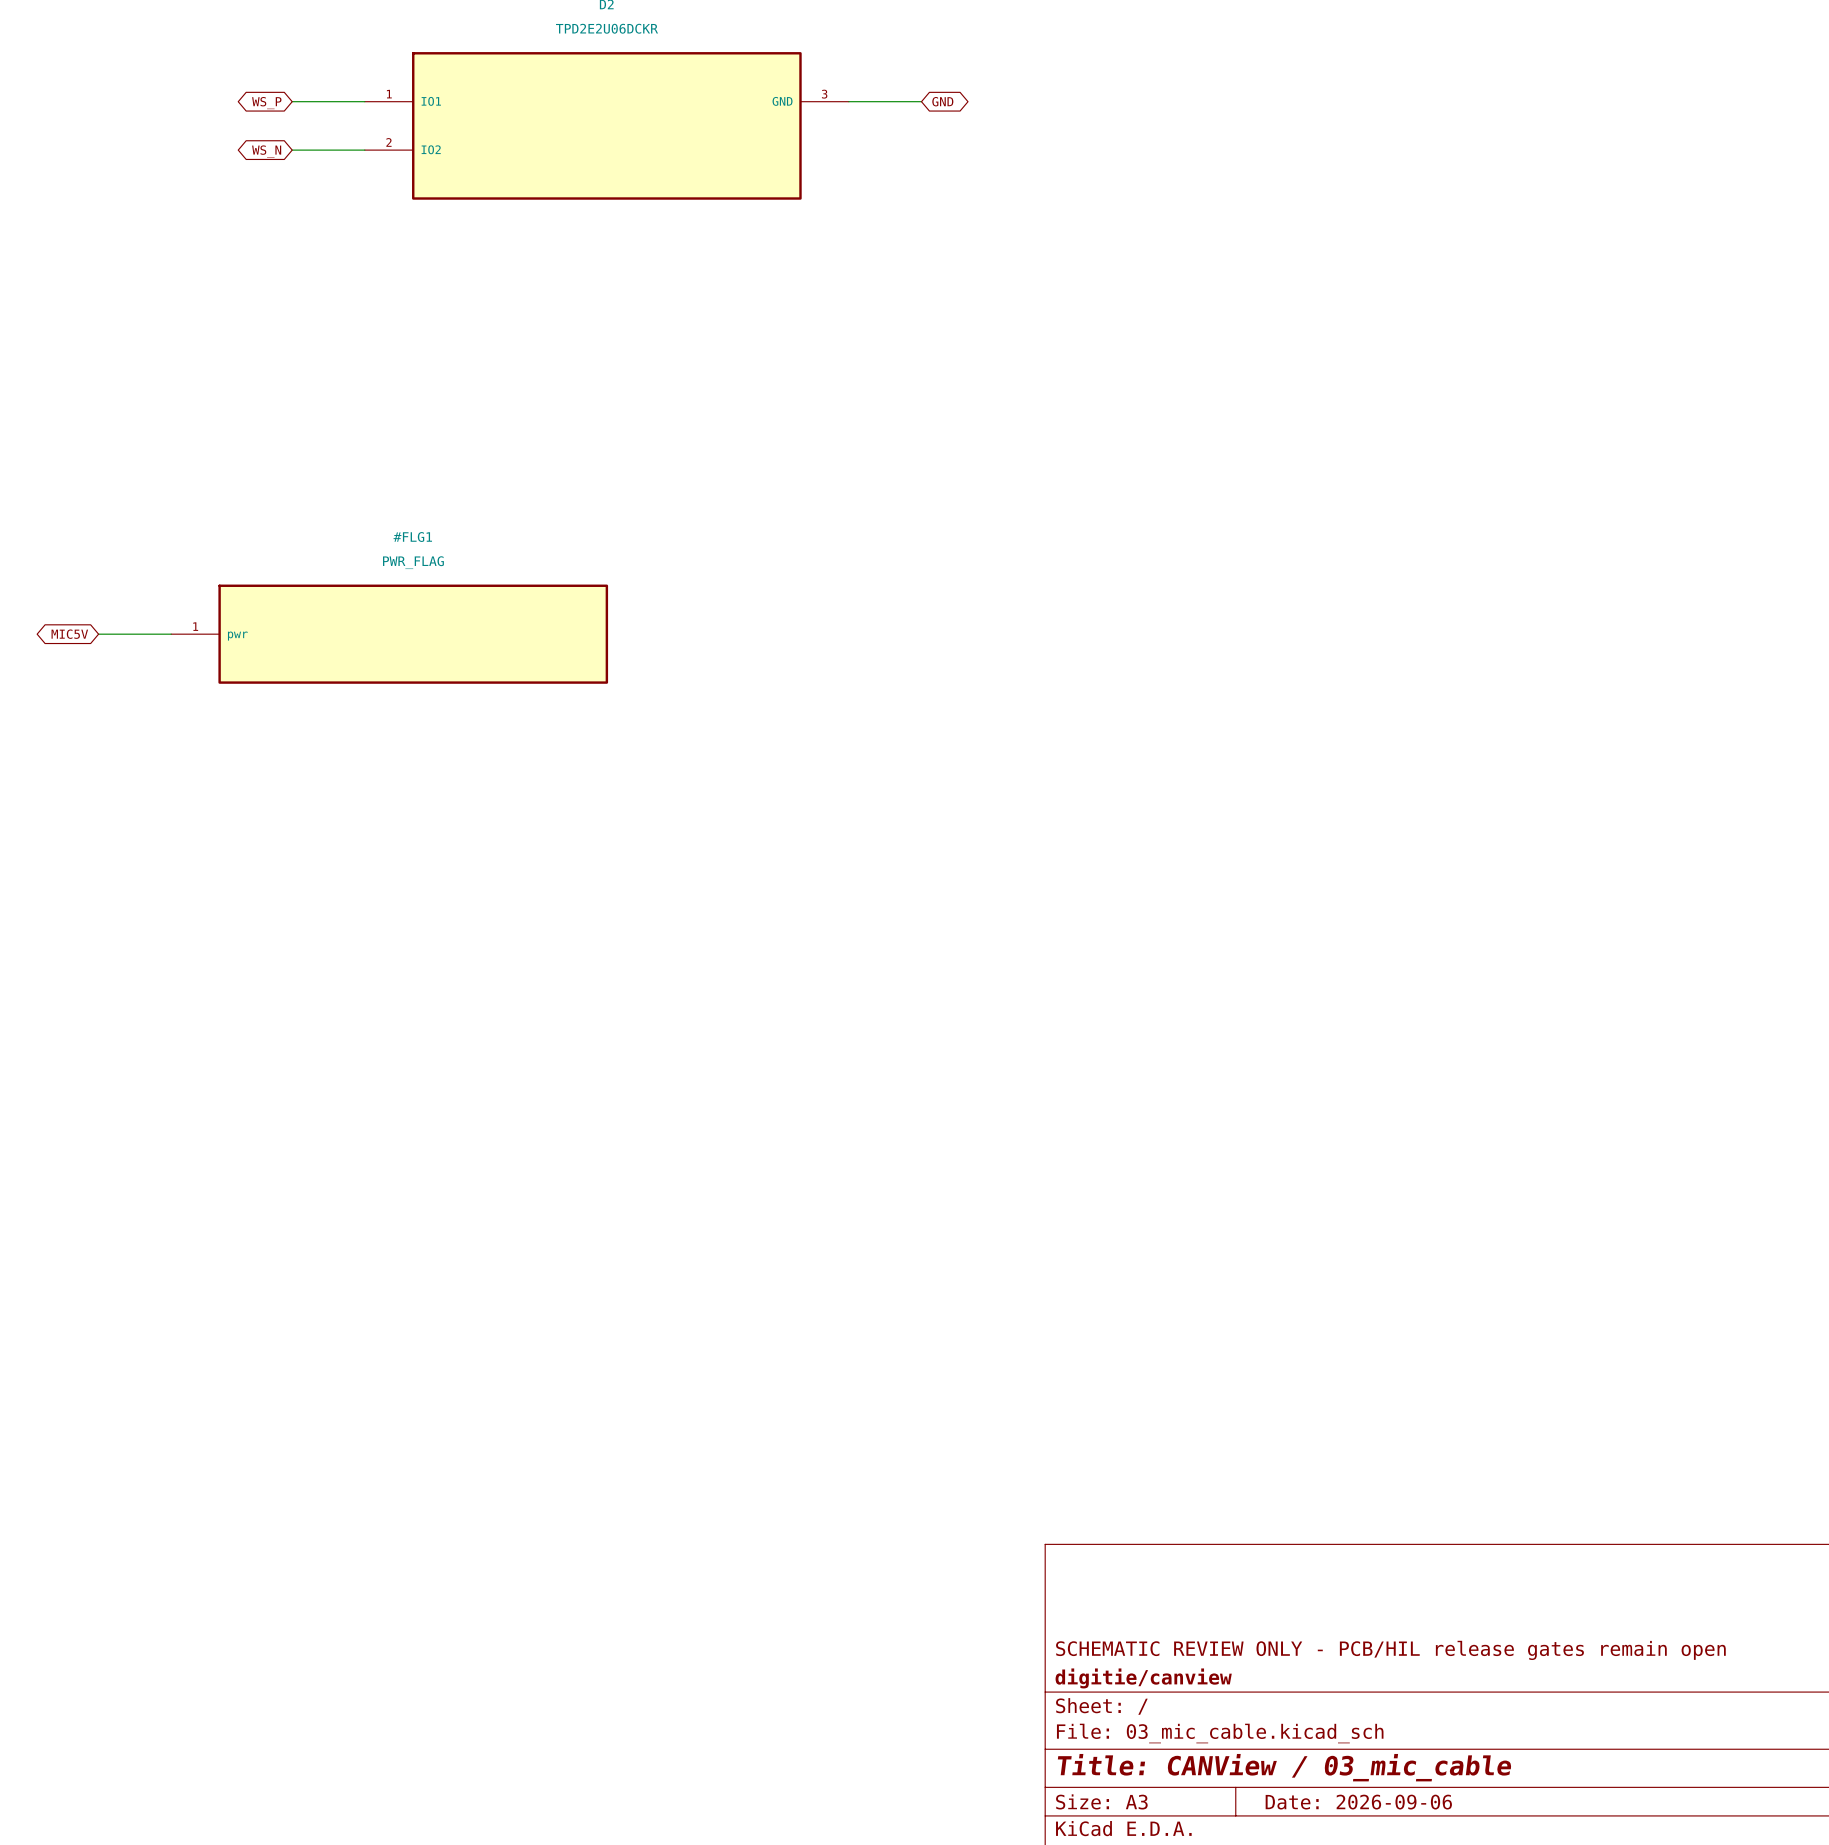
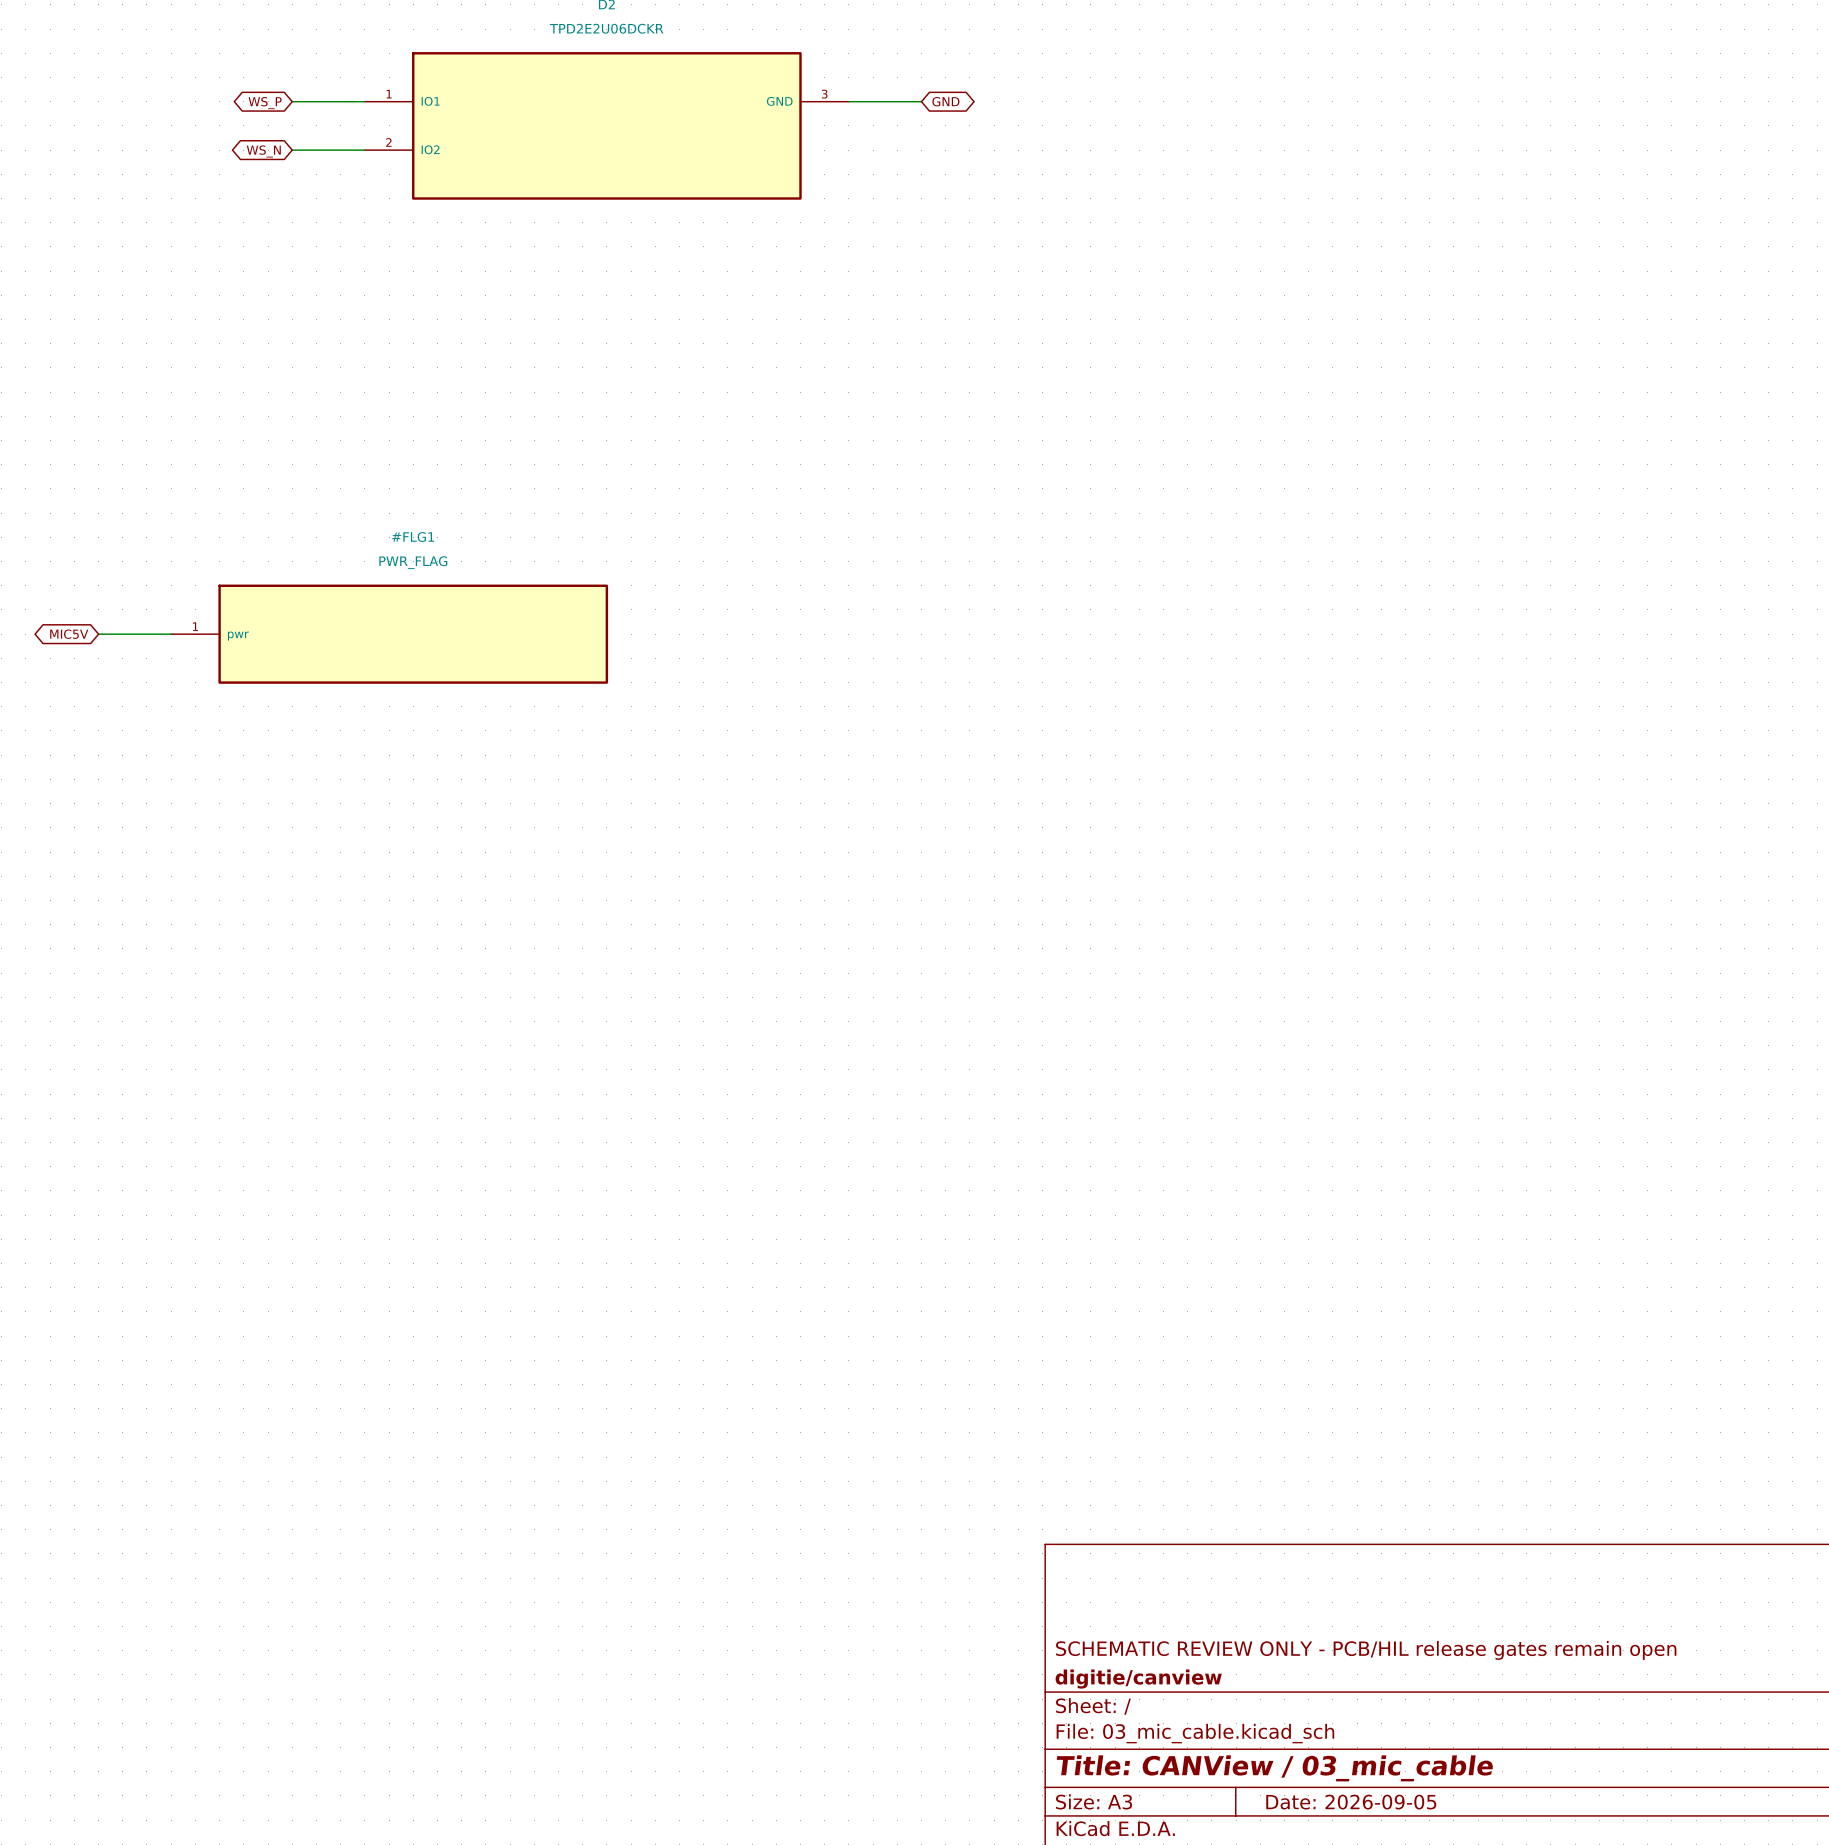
title block: Date: 2026-09-06 (1358, 1802) -> Date: 2026-09-05 (1351, 1802)

